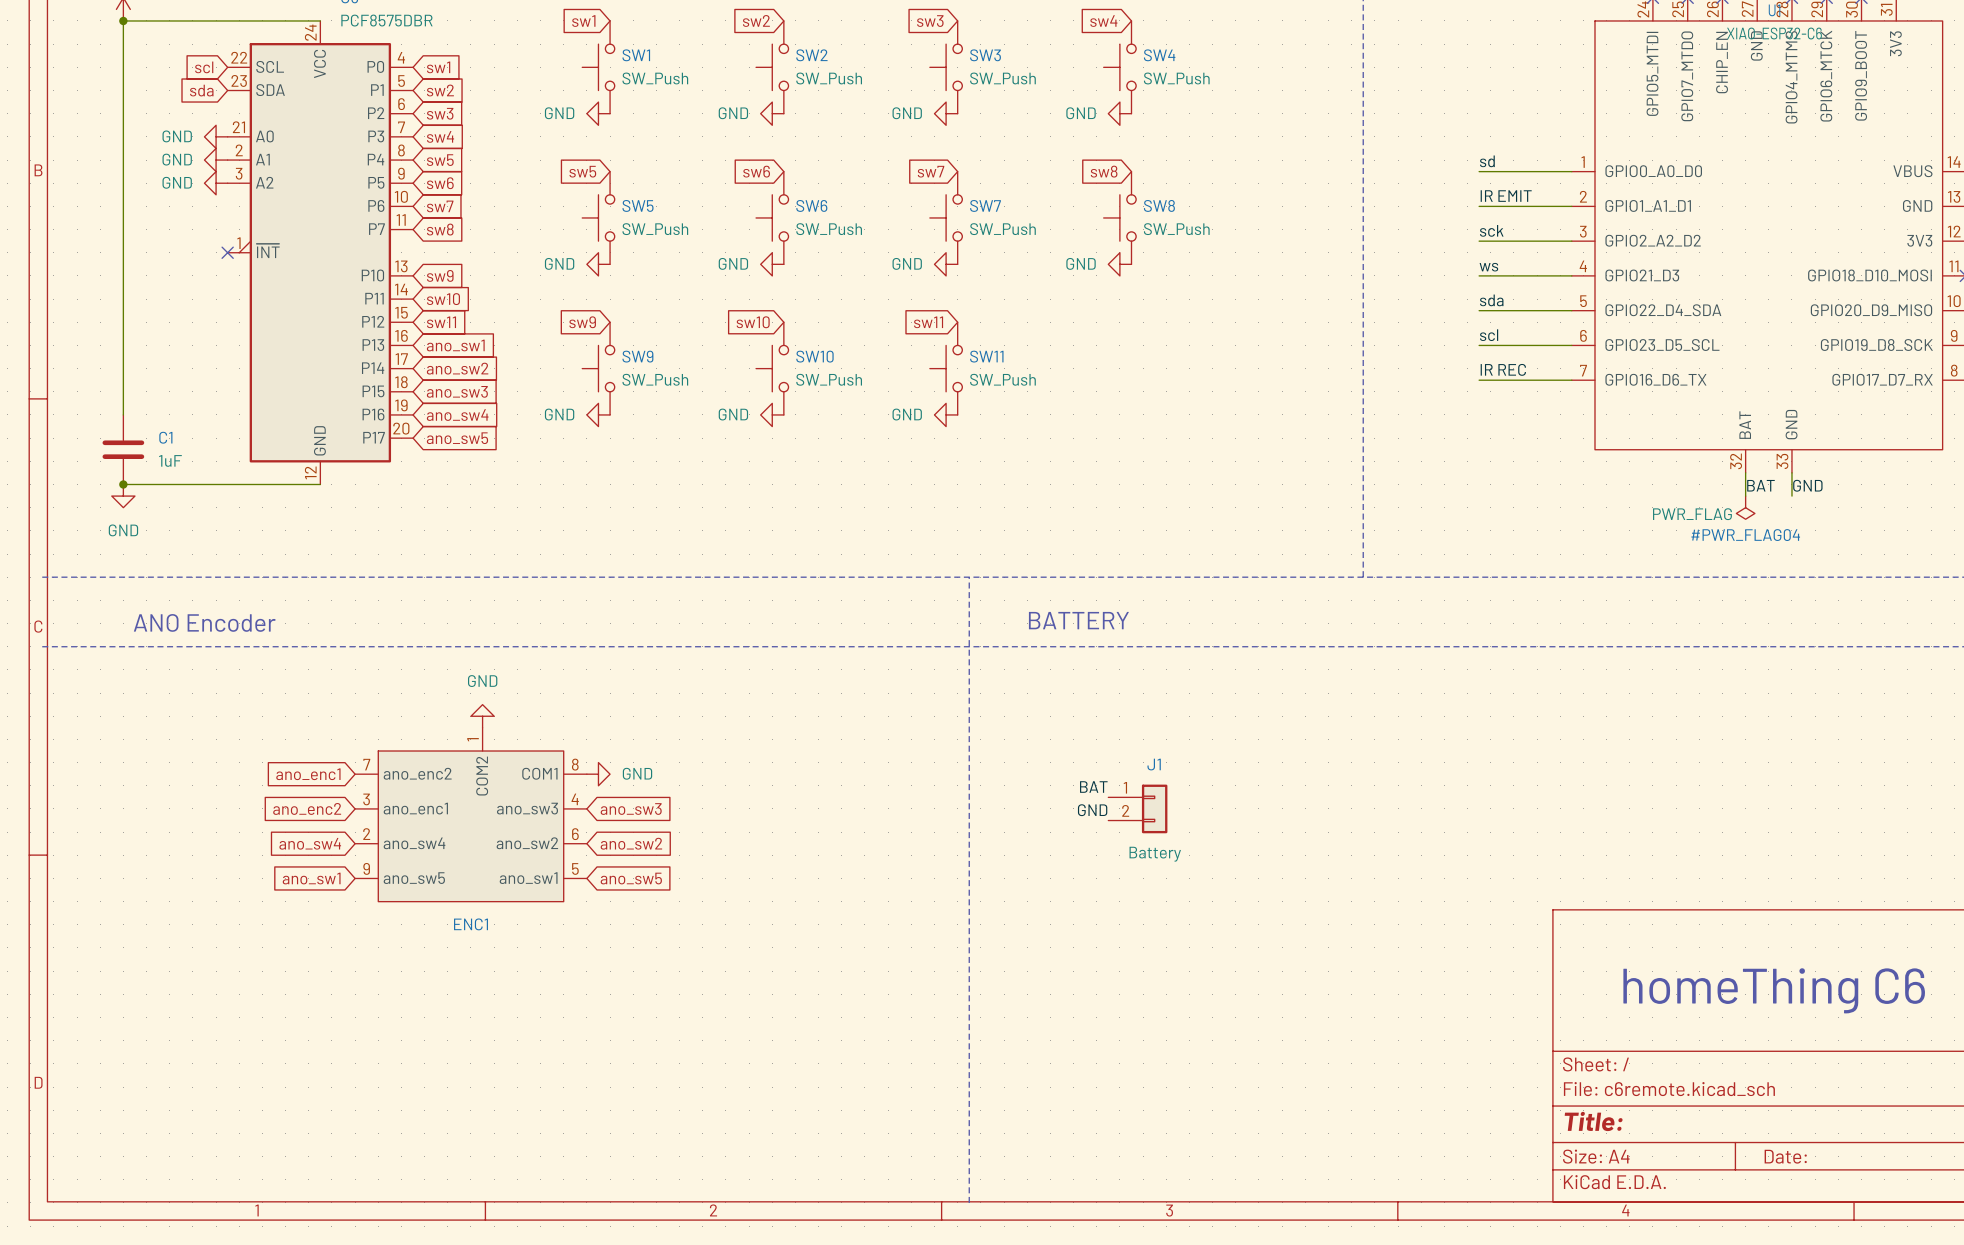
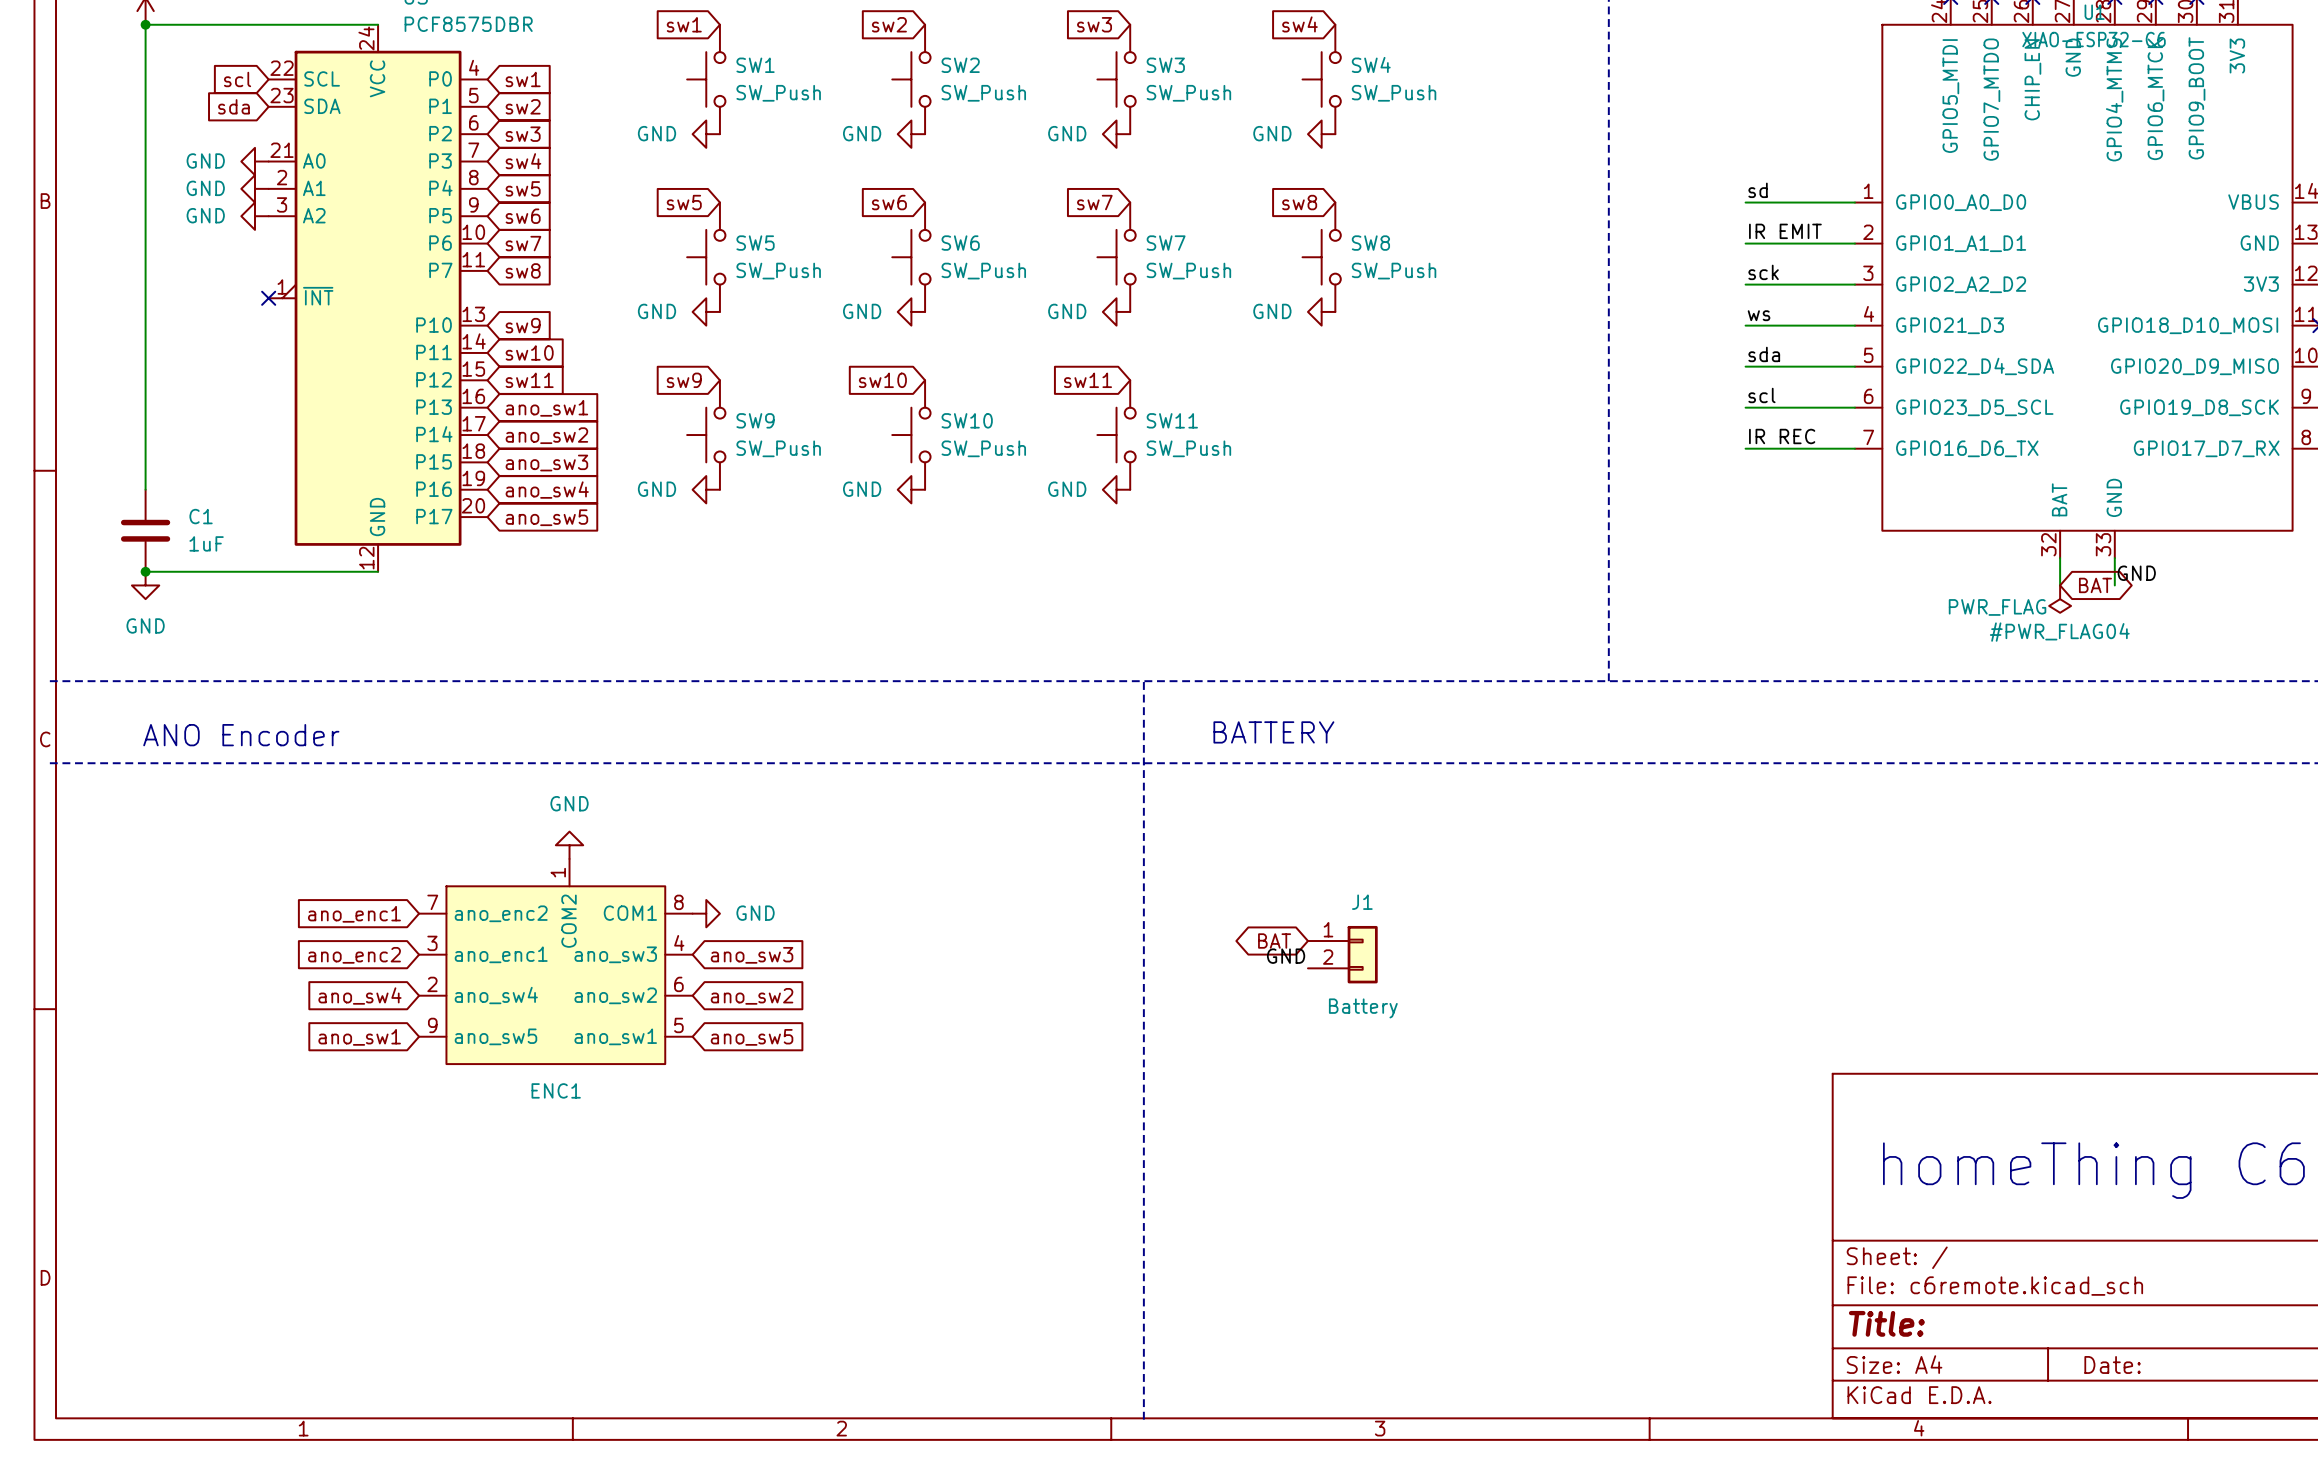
label: BAT (1760, 485) -> none
global label: none -> BAT (2095, 585)
label: BAT (1093, 787) -> none
global label: none -> BAT (1274, 941)

